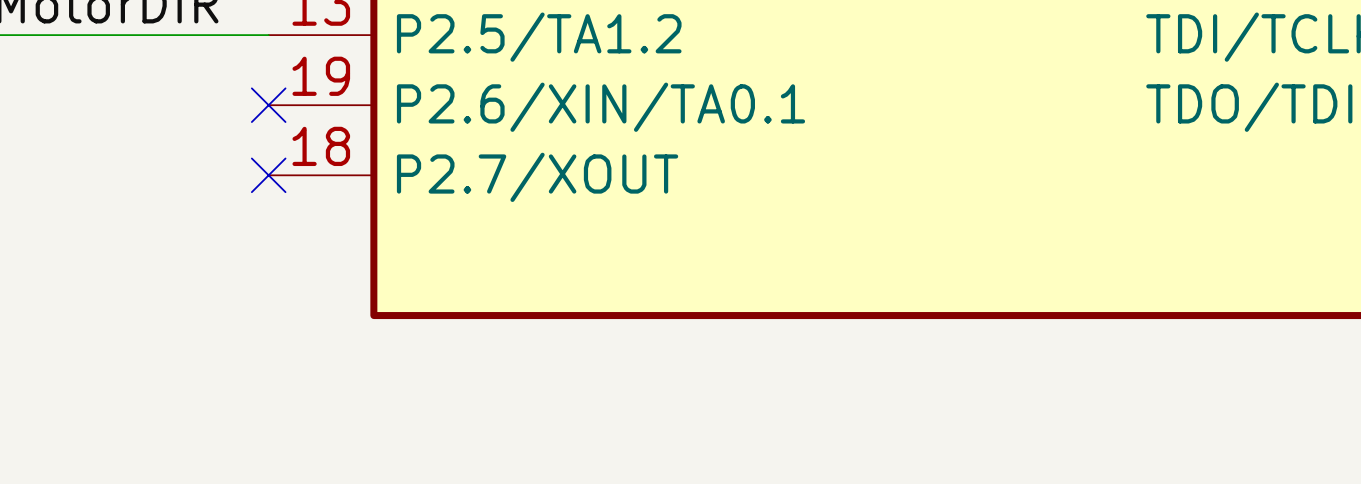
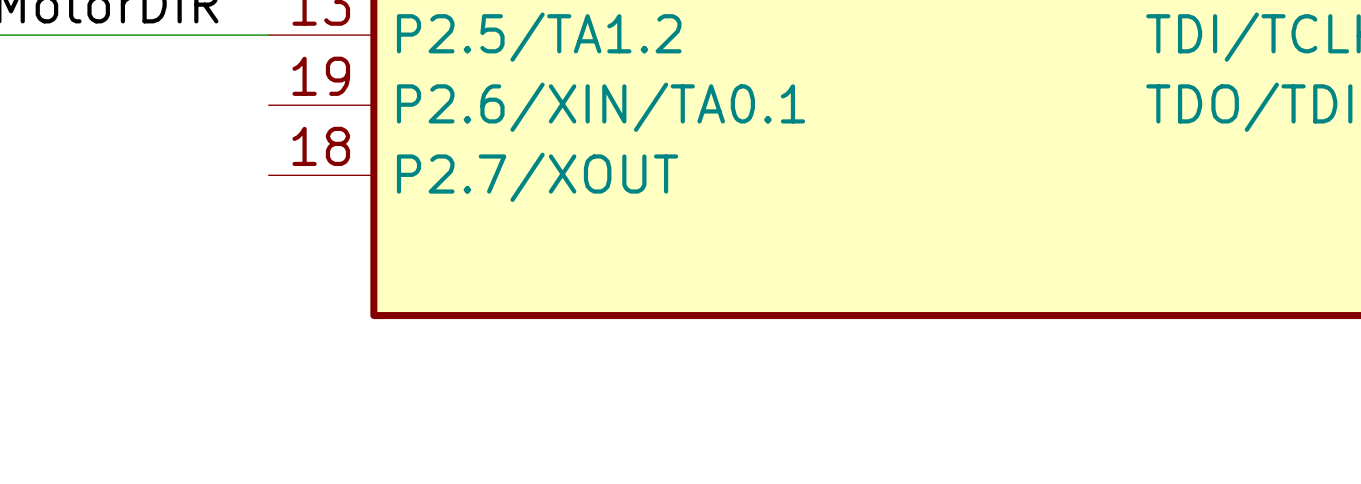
no-connect mark: (268, 105) -> none
no-connect mark: (268, 175) -> none

